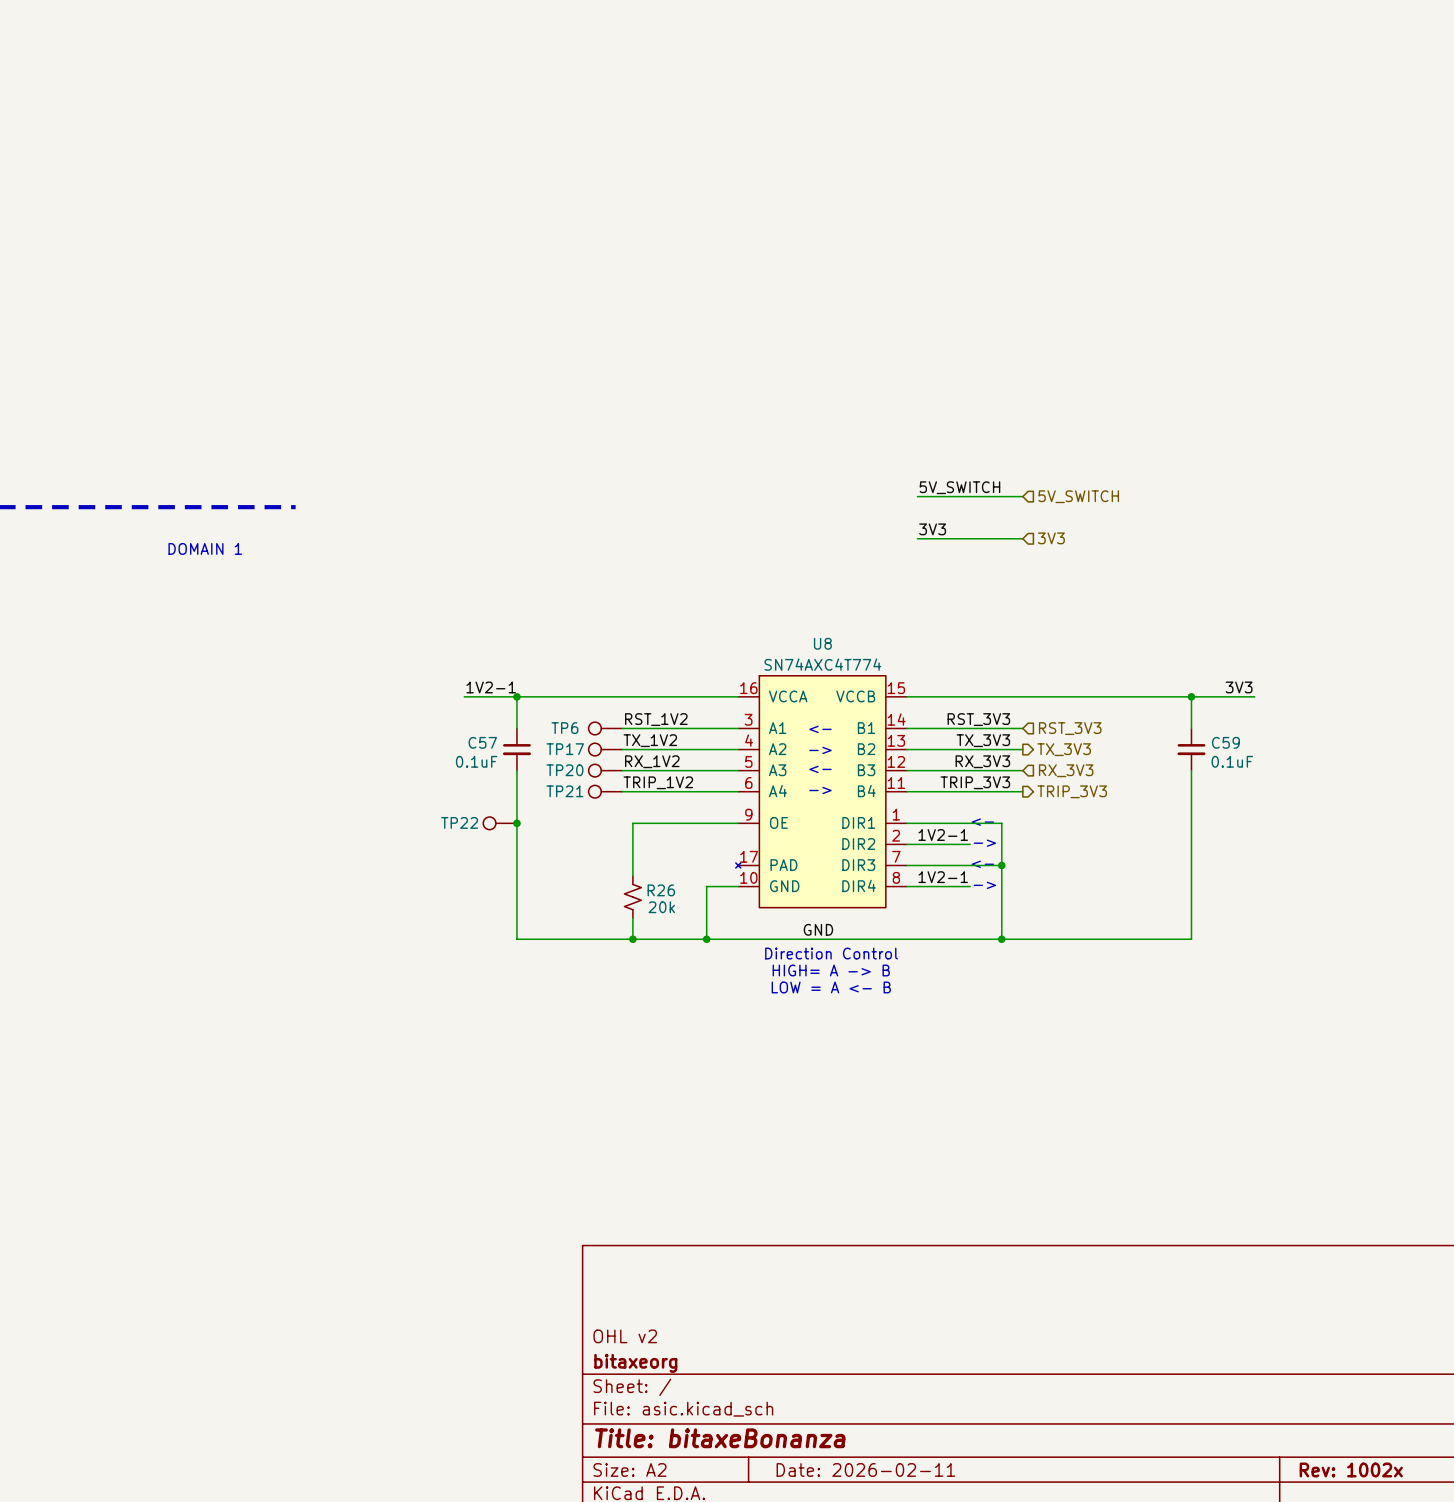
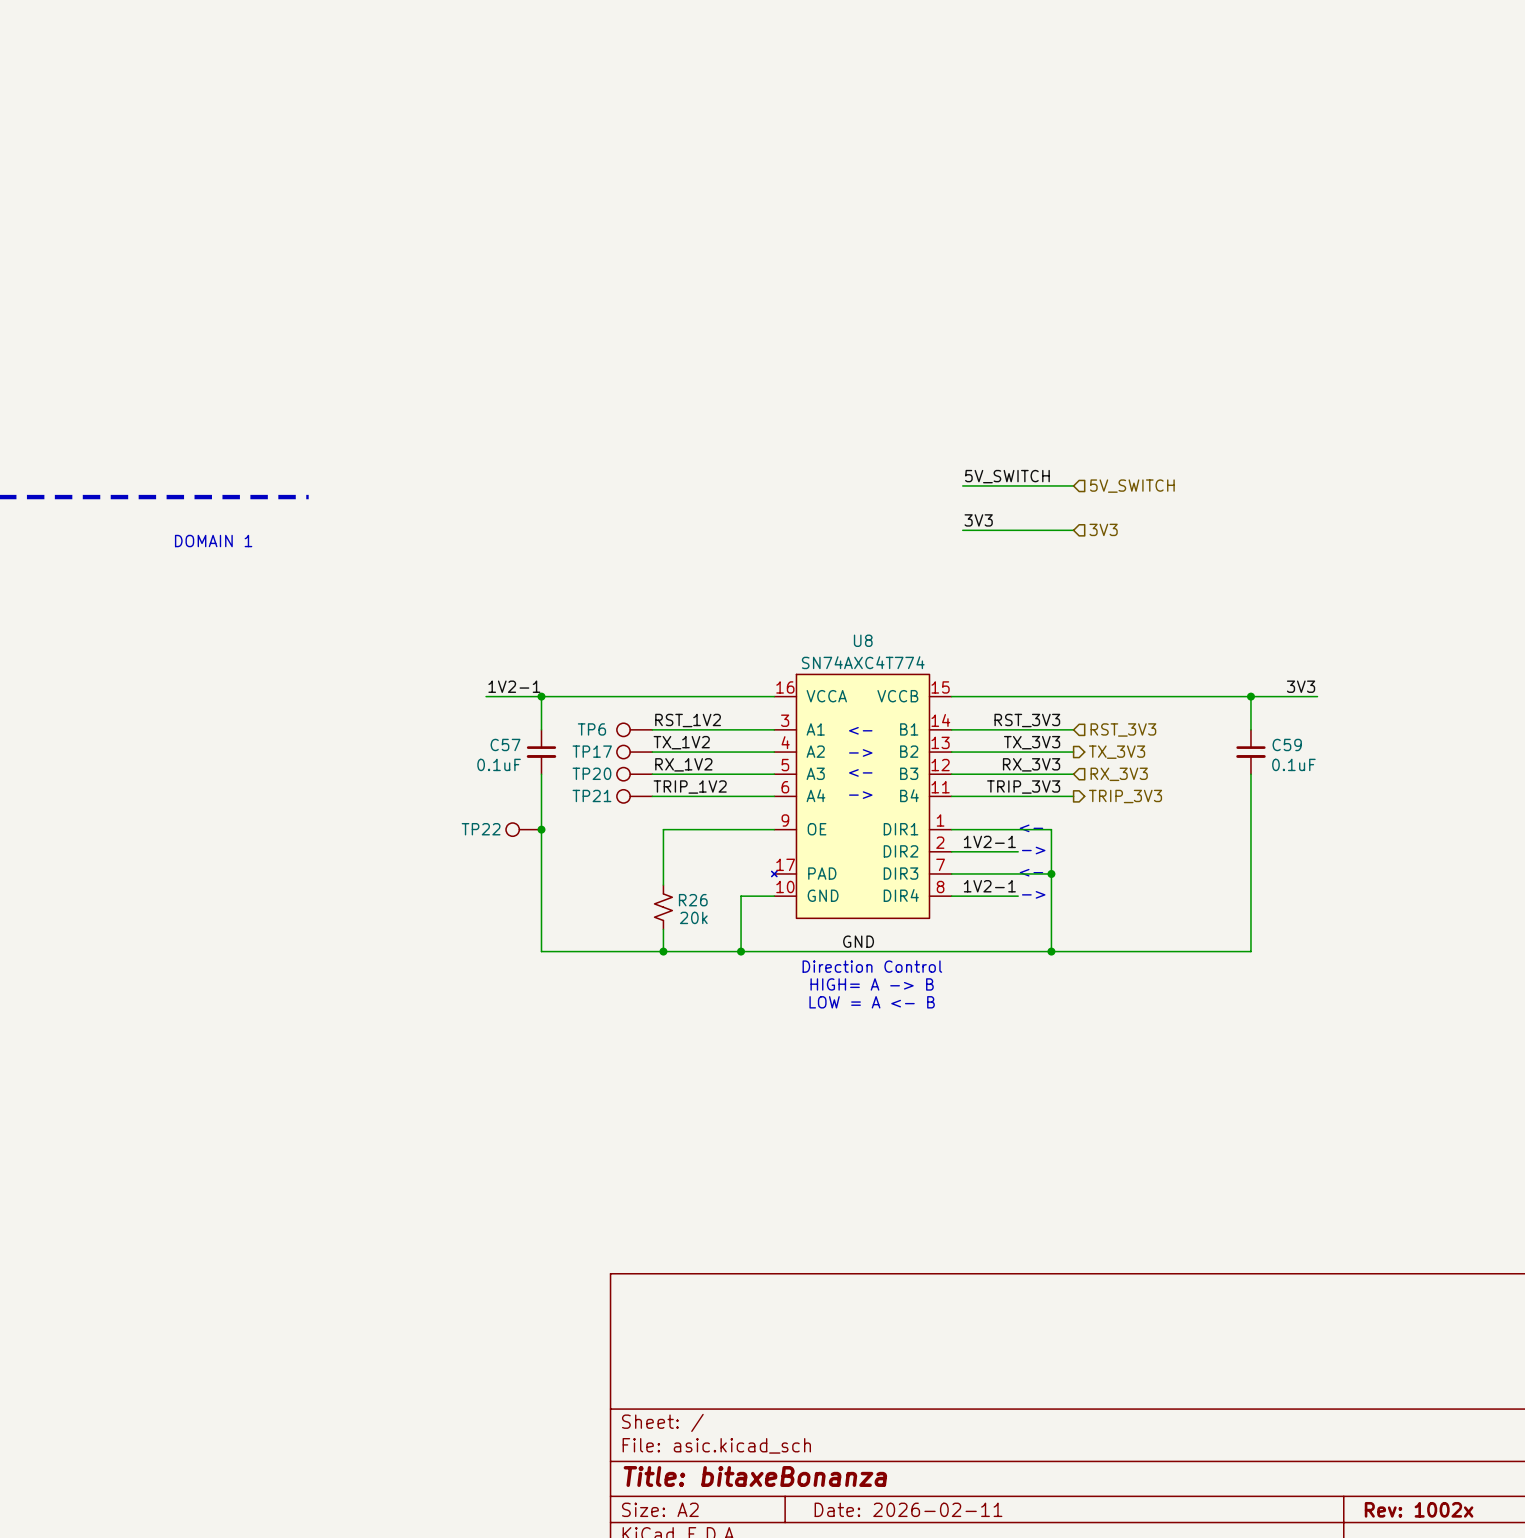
title block: OHL v2 (625, 1336) -> none
title block: bitaxeorg (635, 1363) -> none

